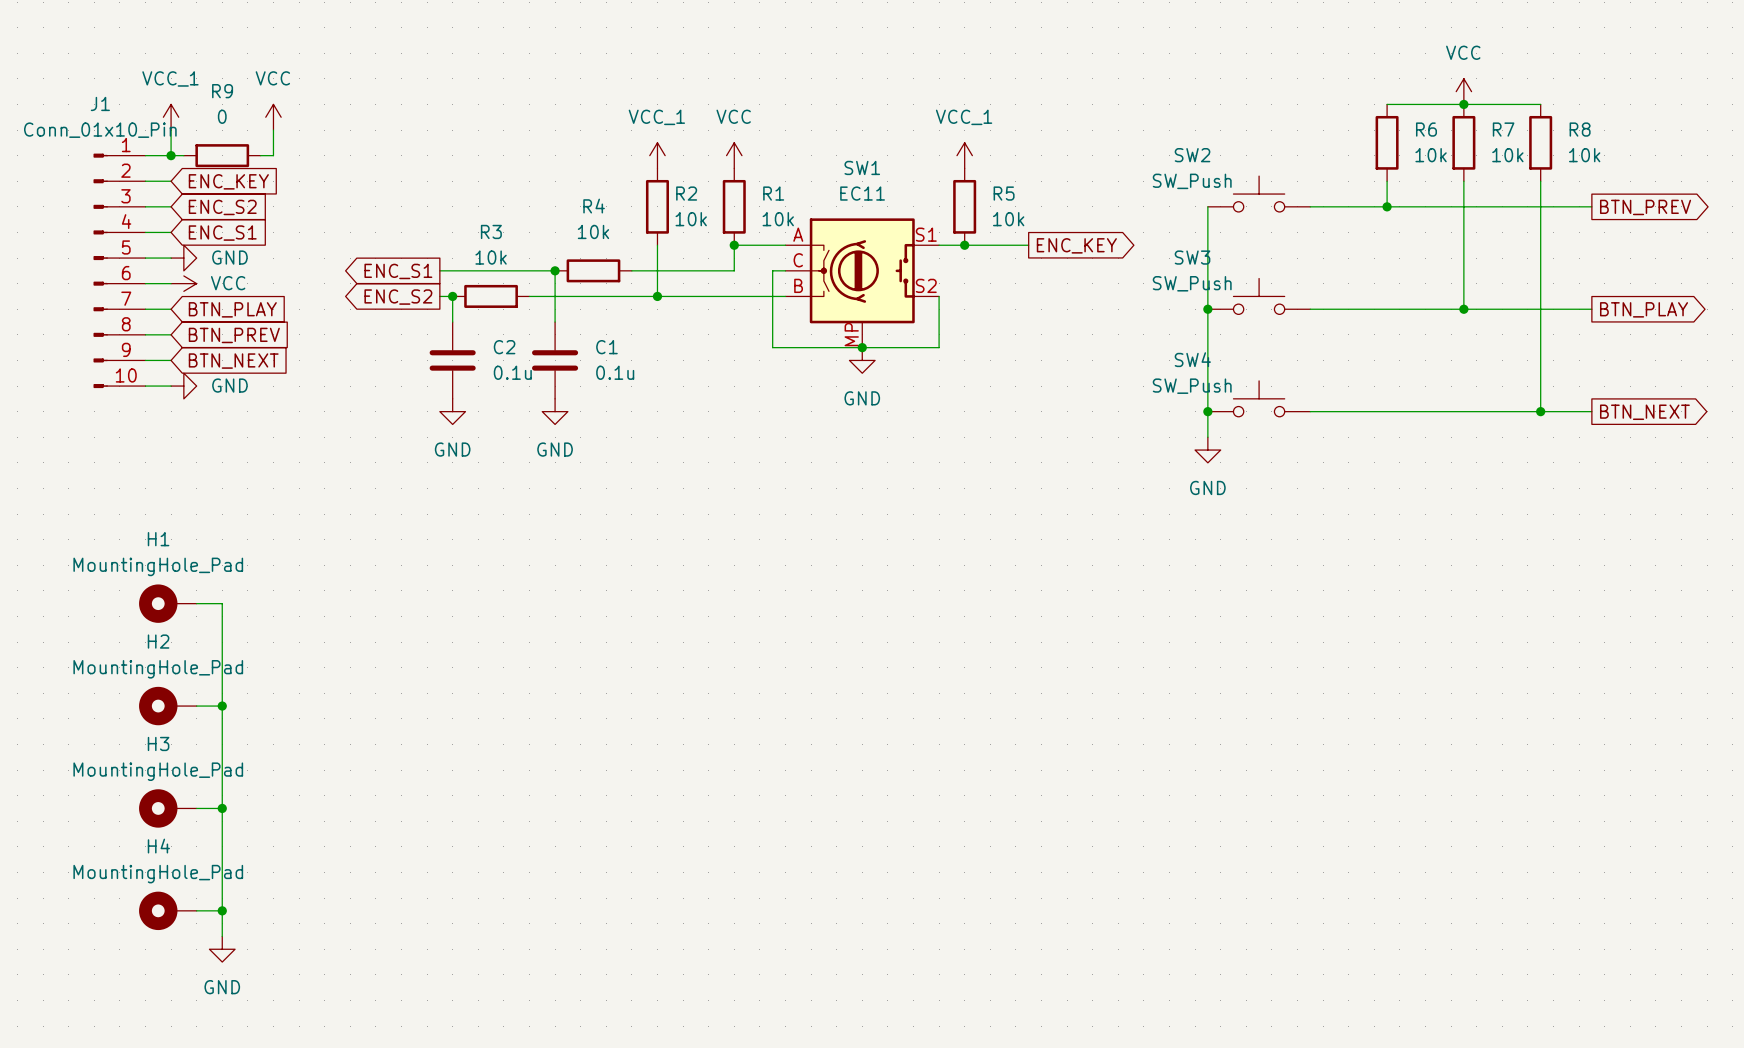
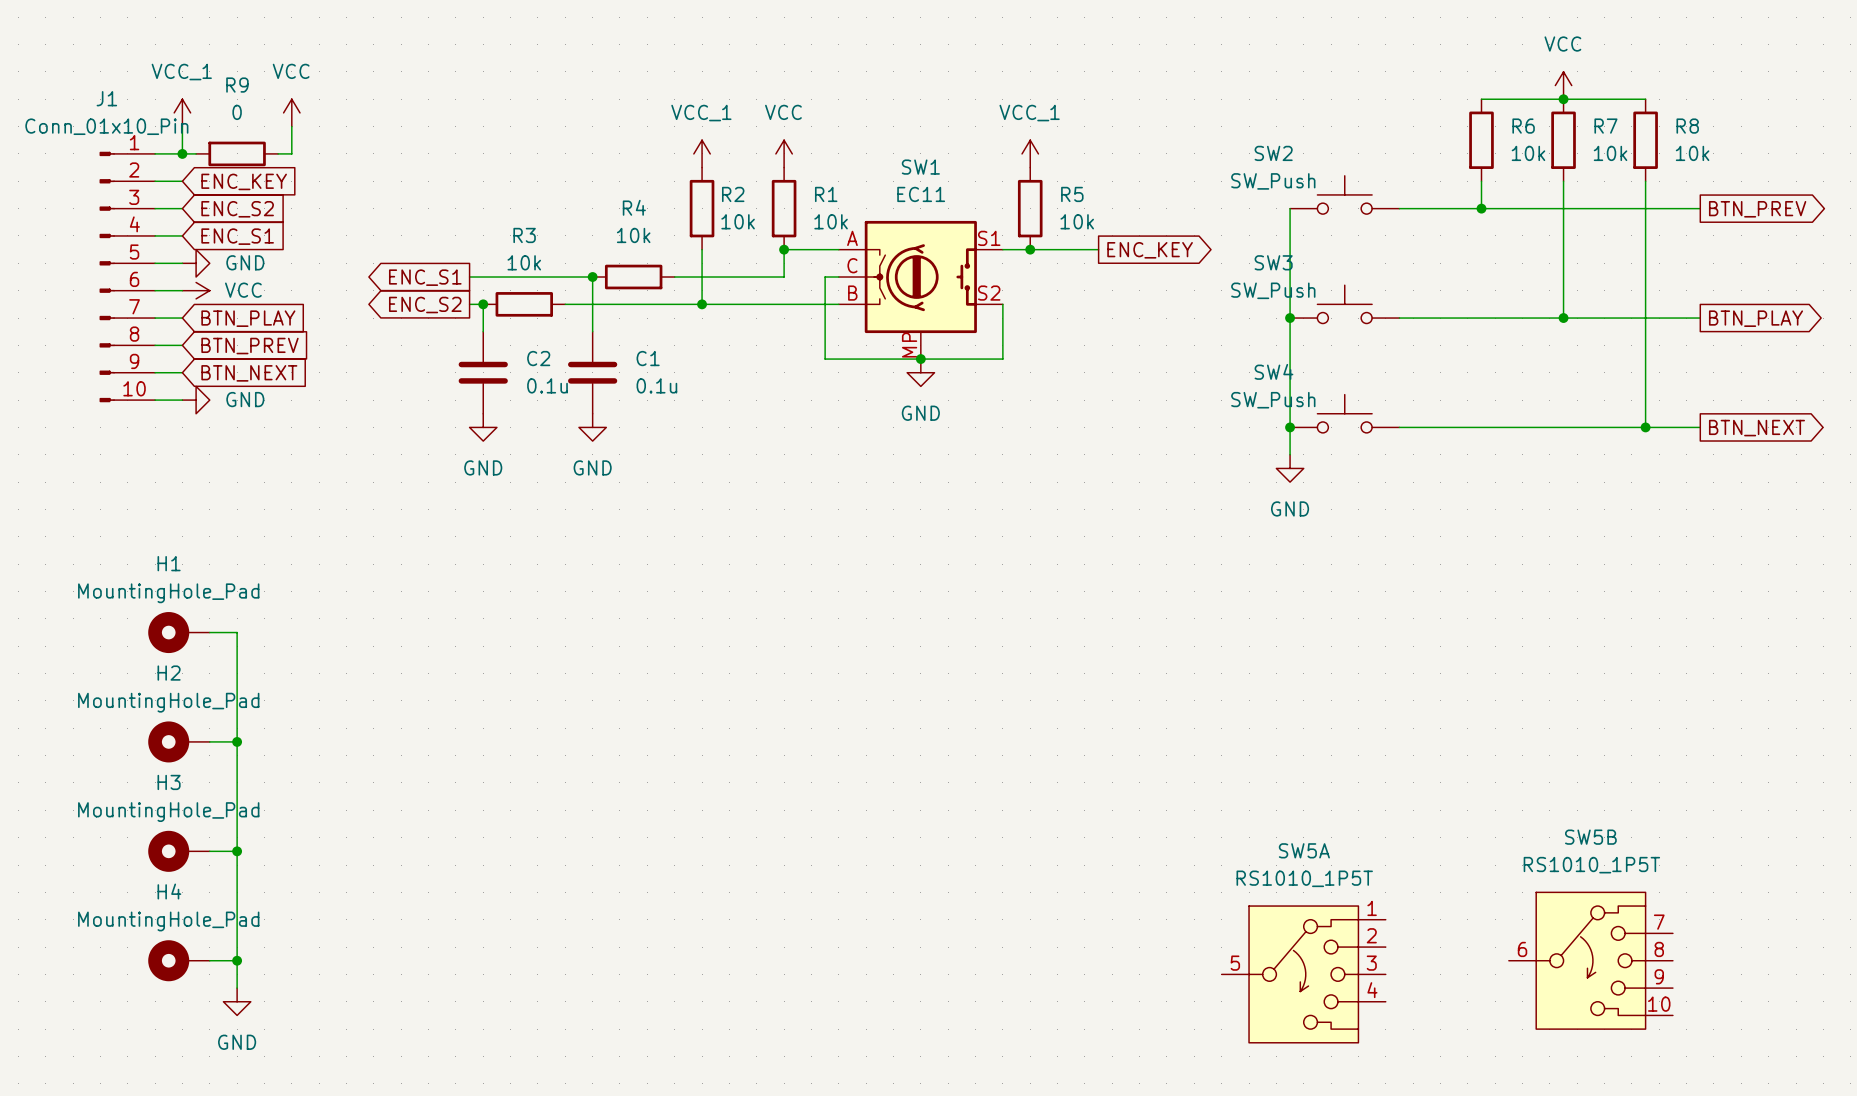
SW5B: none -> RS1010_1P5T (1590, 960)
SW5A: none -> RS1010_1P5T (1303, 974)

